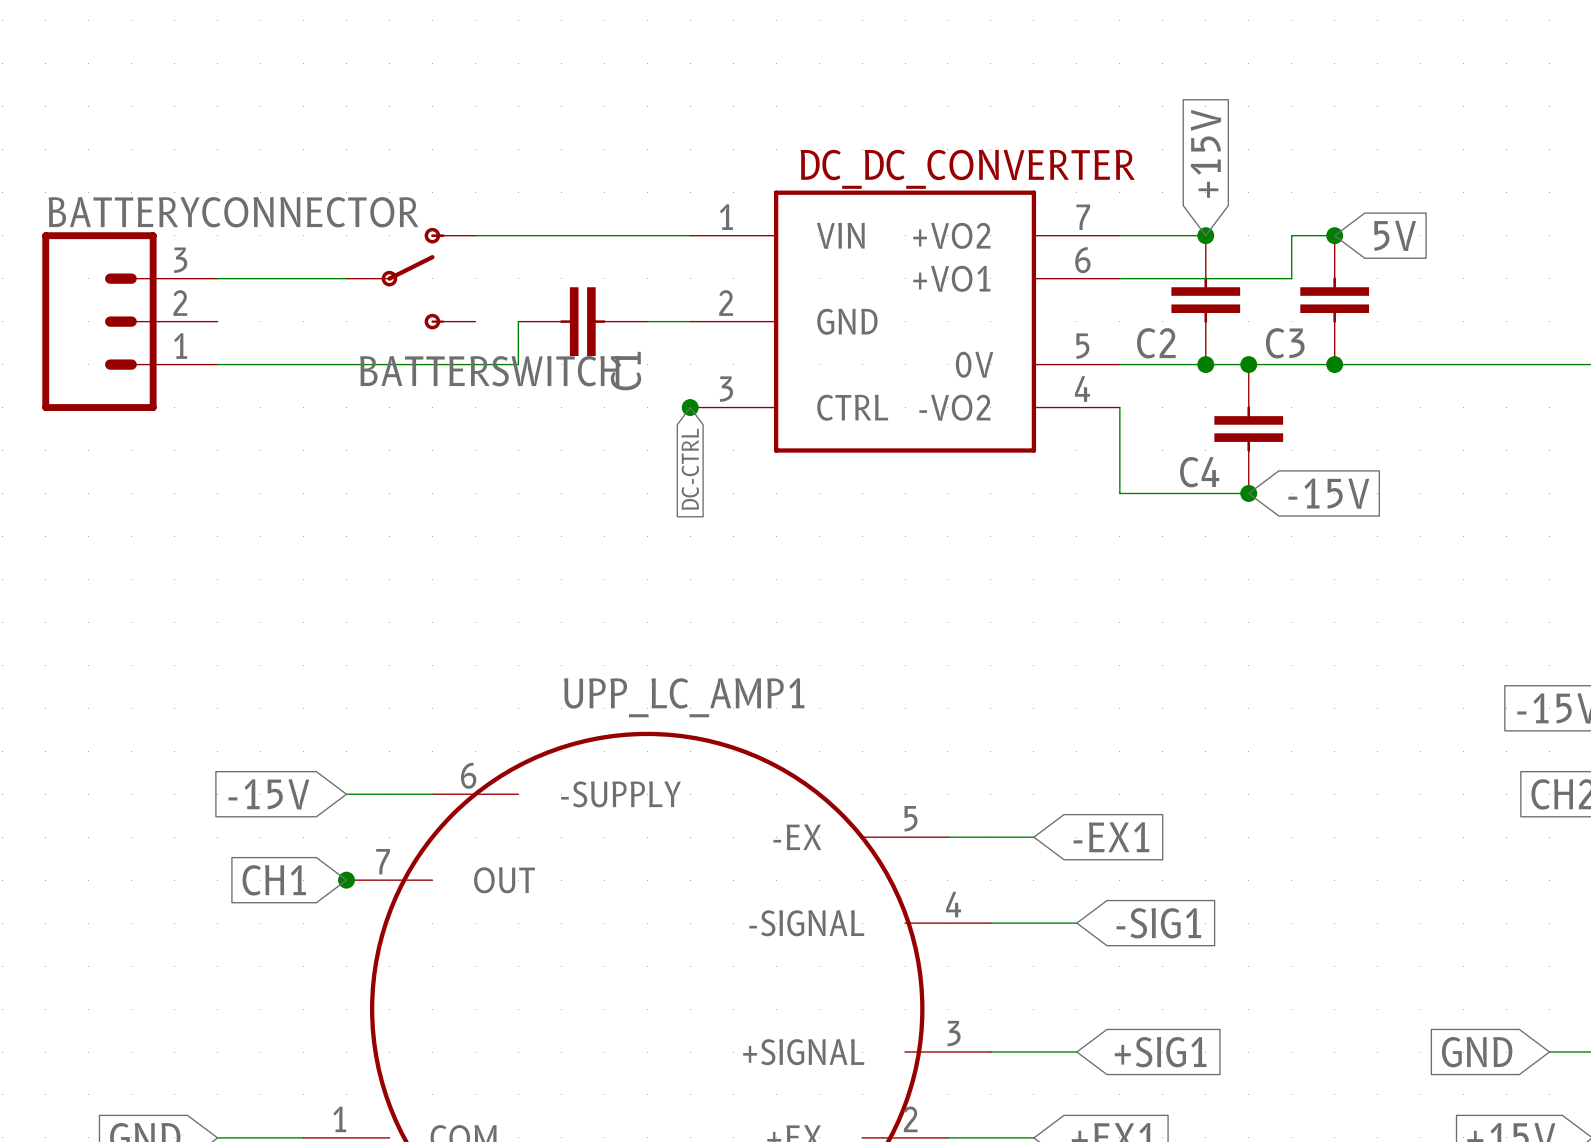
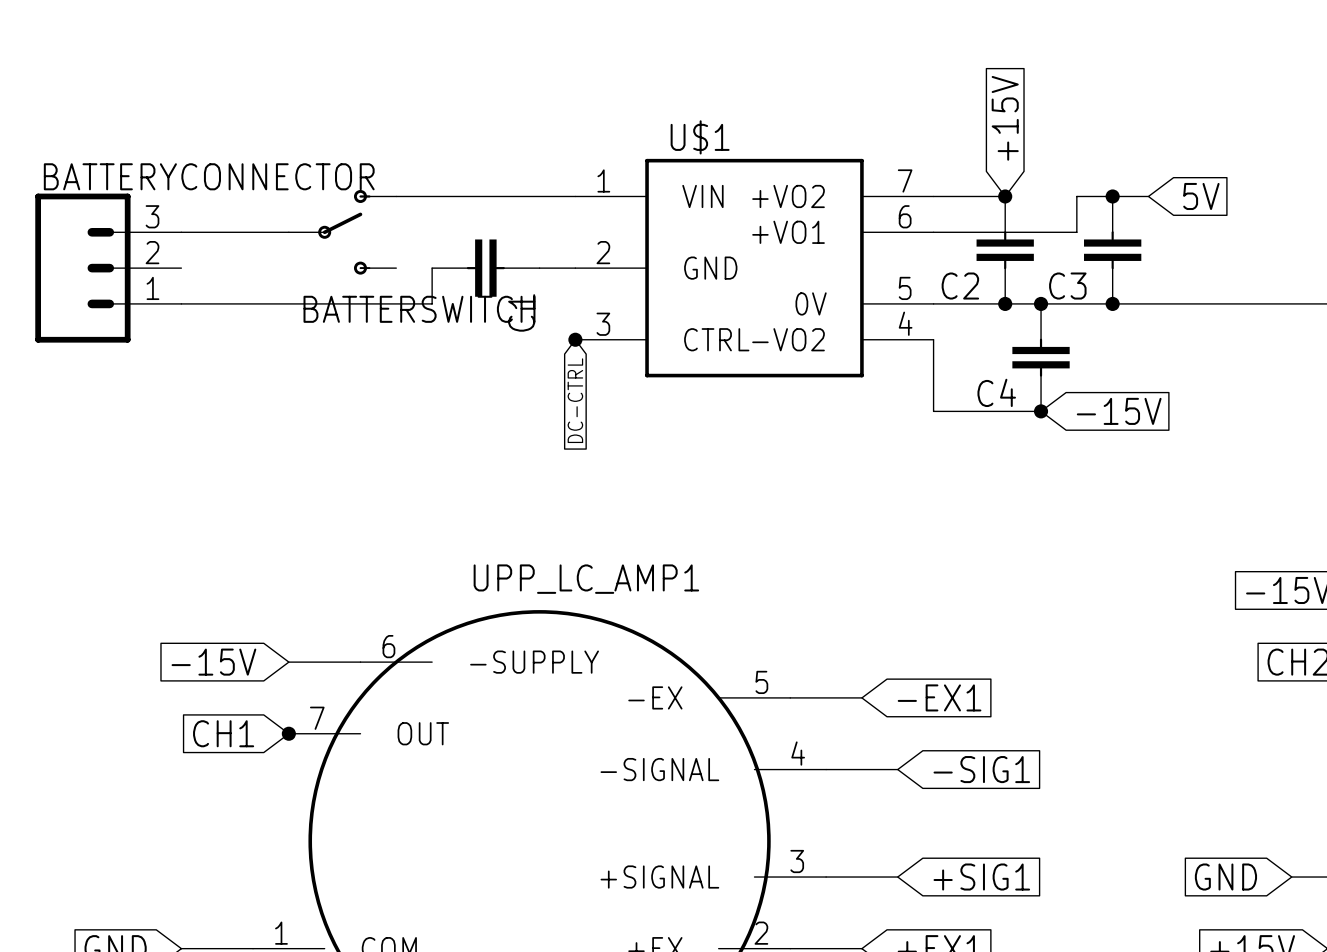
DC_DC_CONVERTER name: DC_DC_CONVERTER (967, 169) -> U$1 (700, 137)
wire: none -> (1112, 196) (1148, 196)
global label position: 5V (1395, 235) -> 5V (1201, 196)

